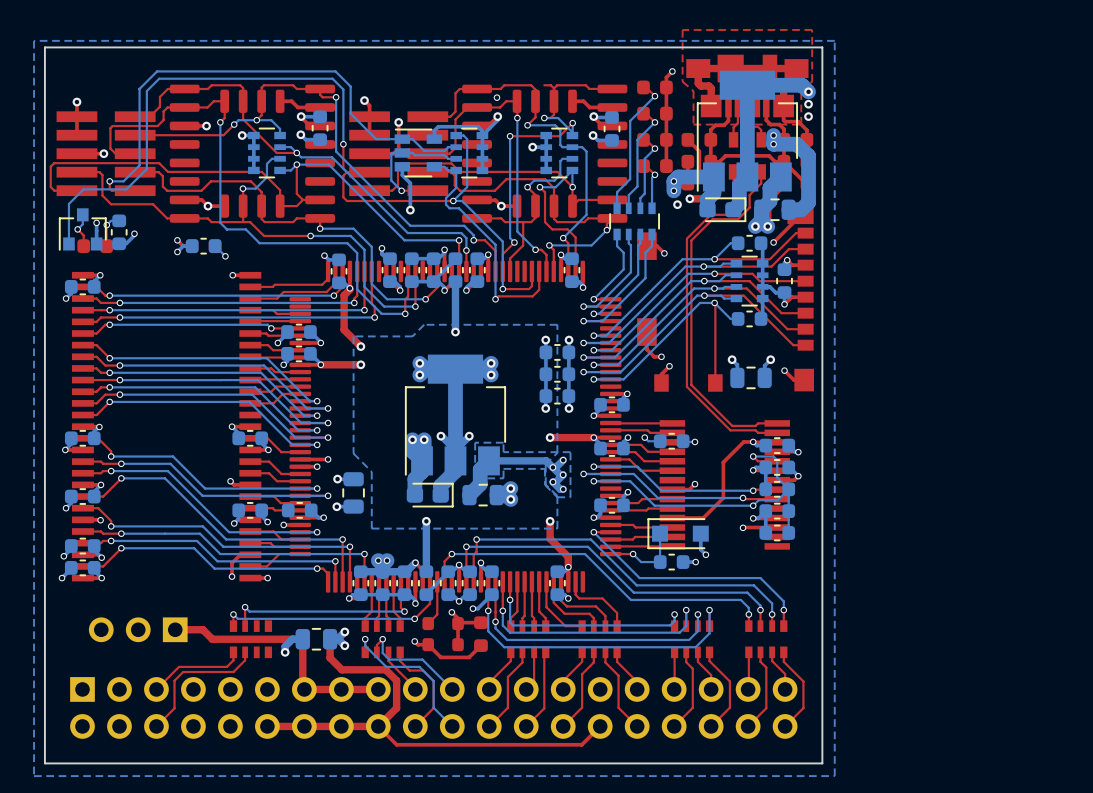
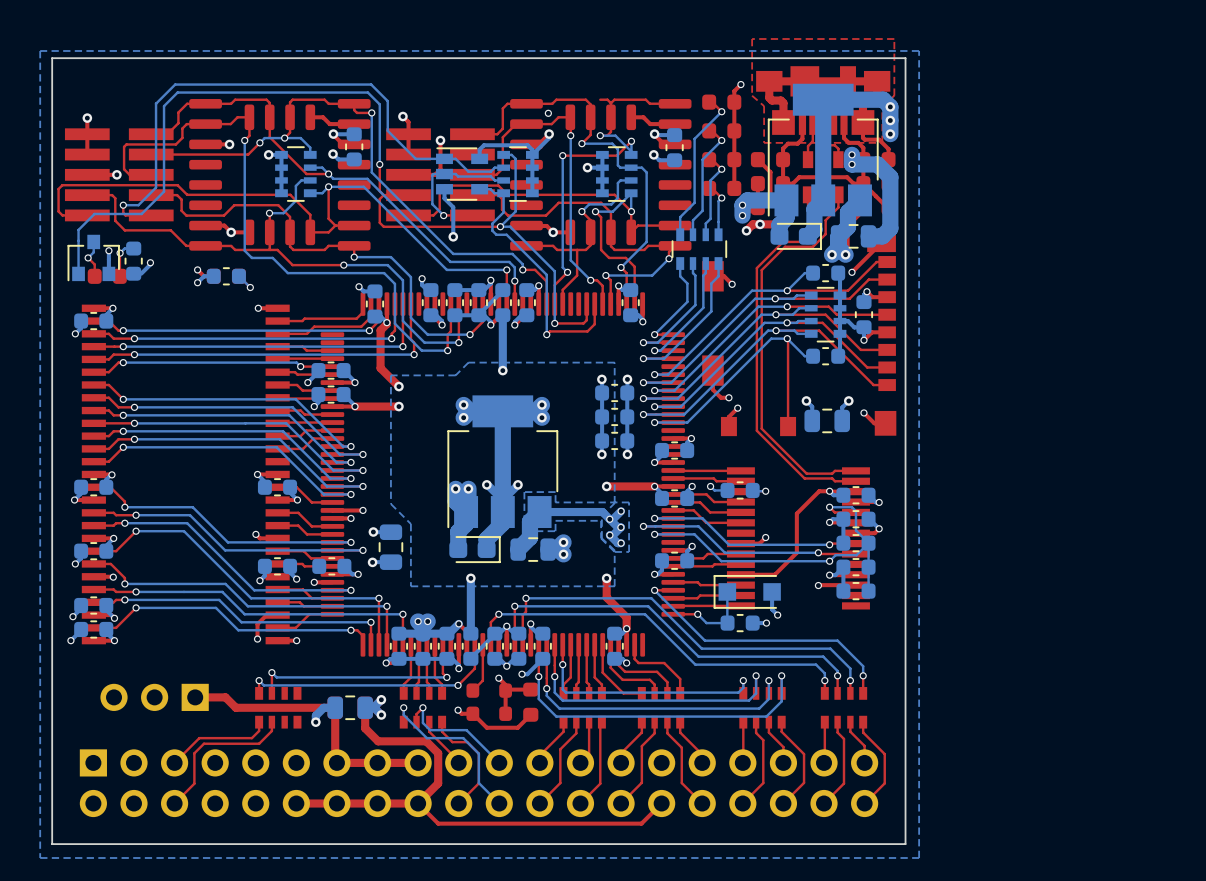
bottom track: none -> (890, 106) (890, 134)
top track: none -> (760, 224) (752, 224) (746, 230)

